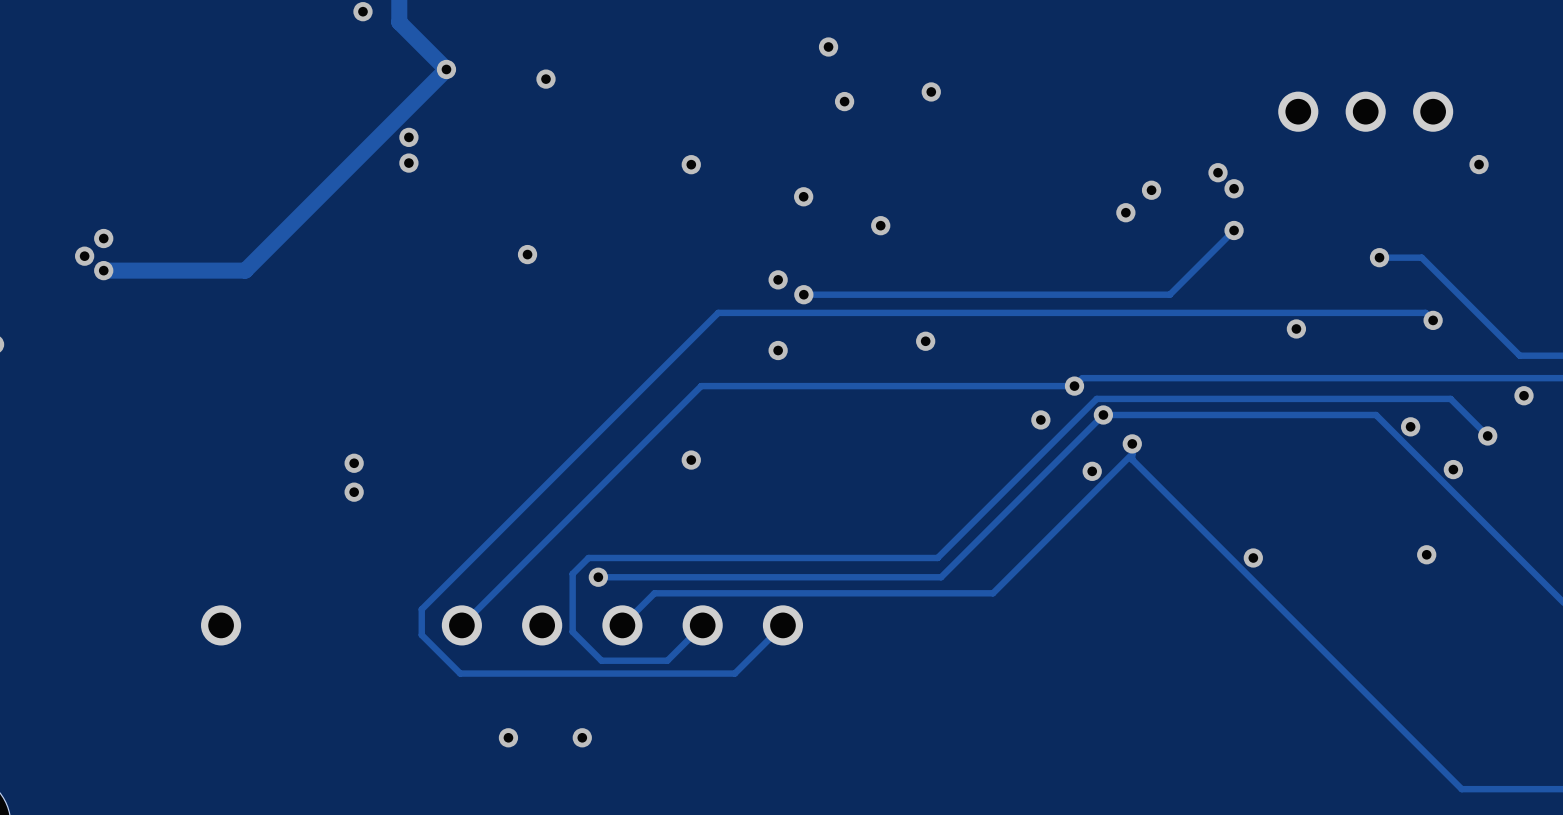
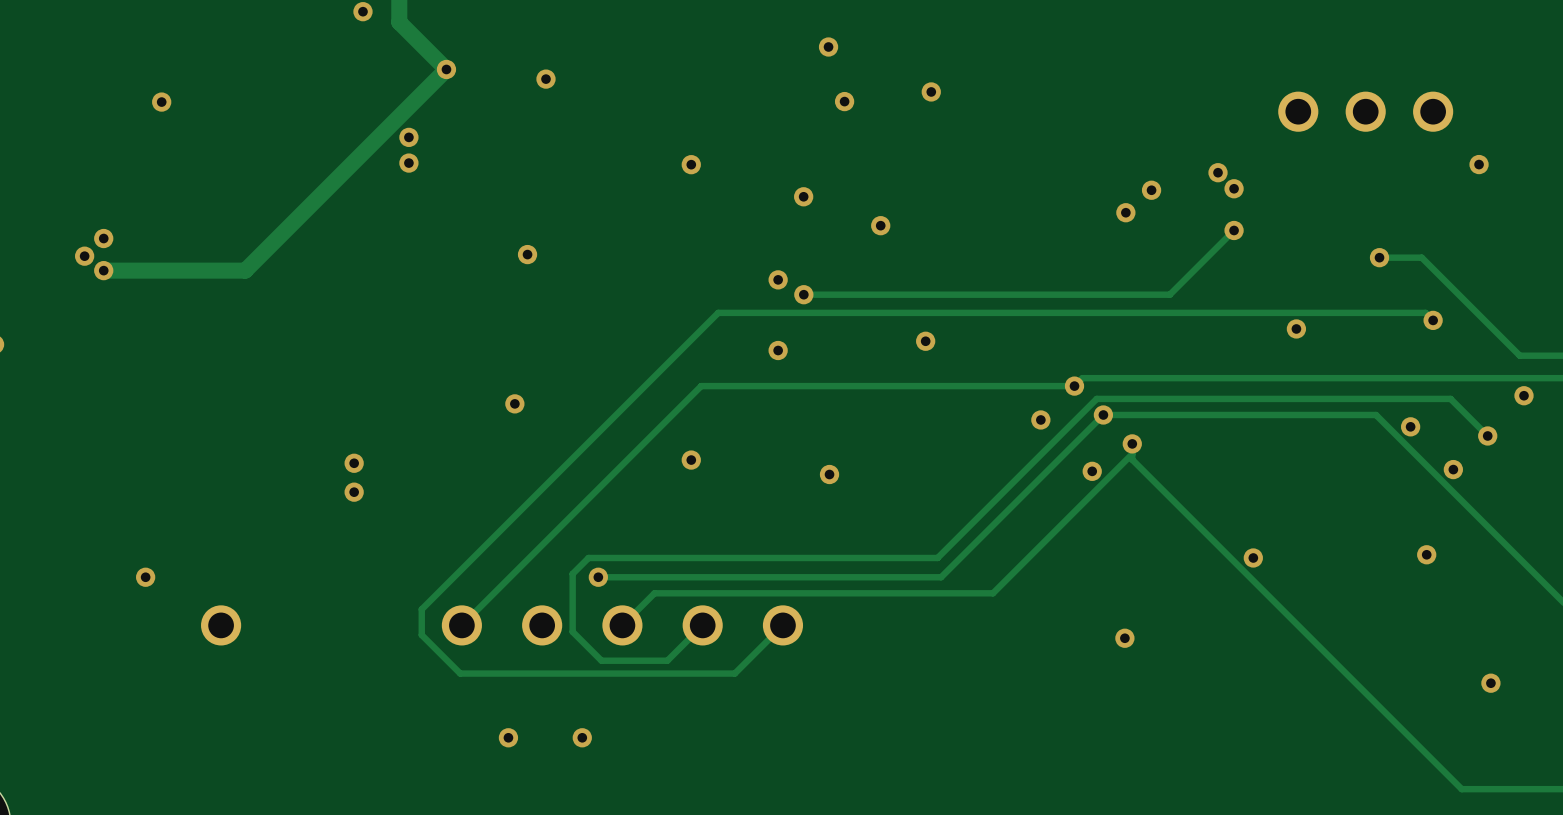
via: none -> (161, 102)
via: none -> (514, 403)
via: none -> (829, 474)
via: none -> (145, 577)
via: none -> (1124, 638)
via: none -> (1490, 683)

